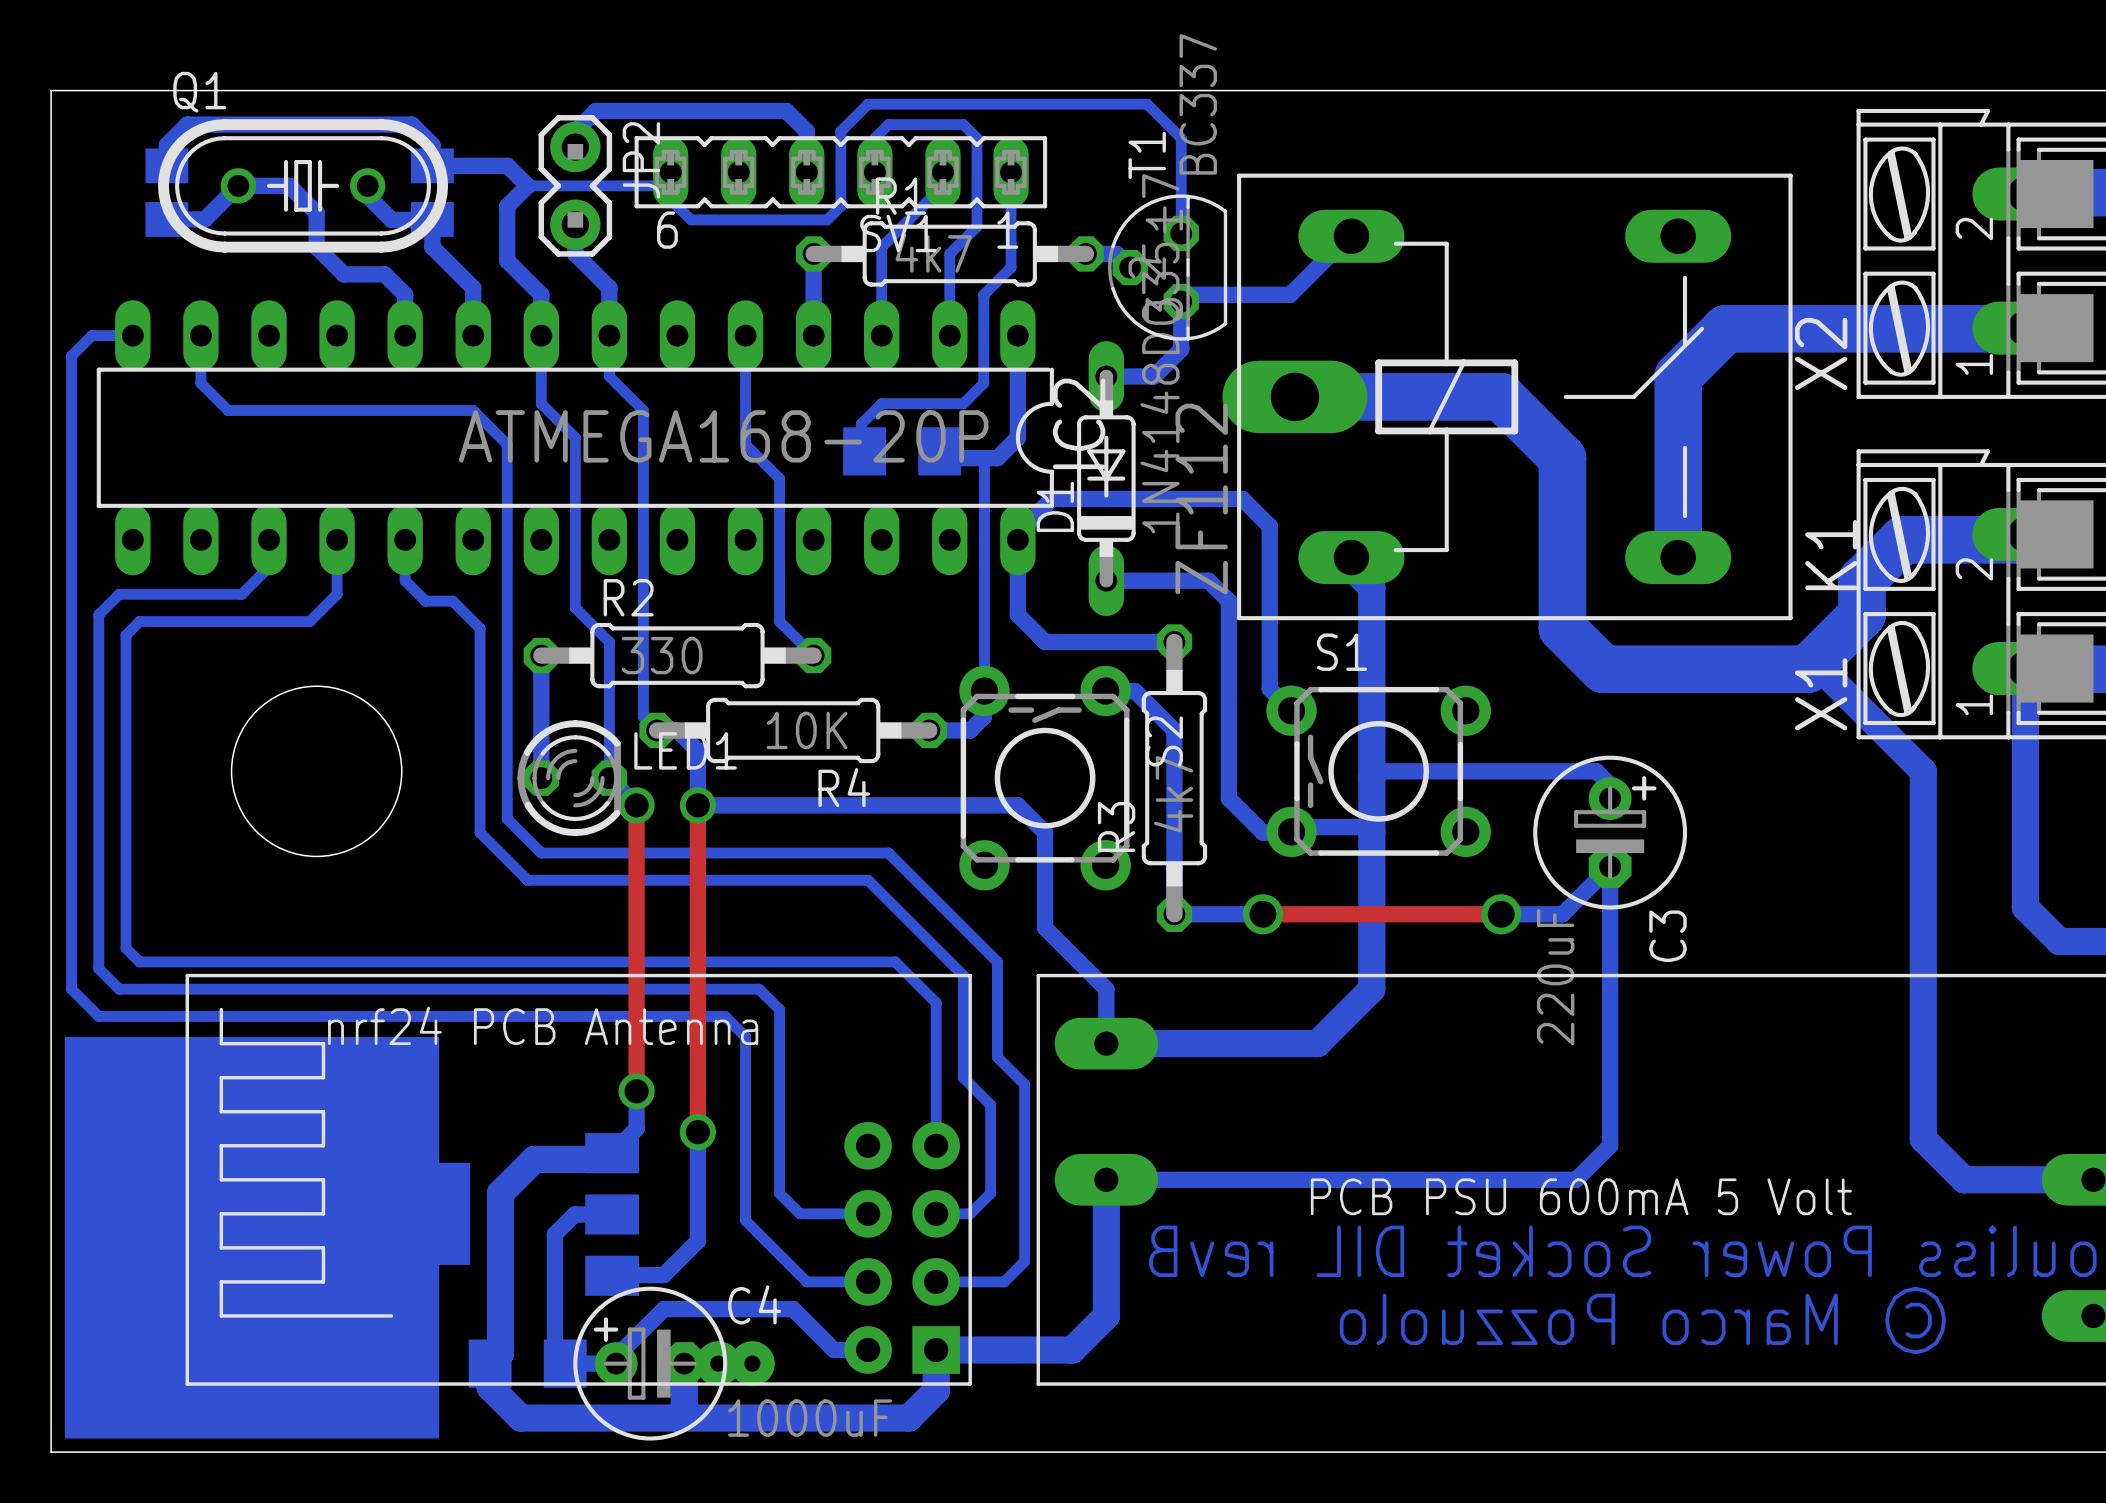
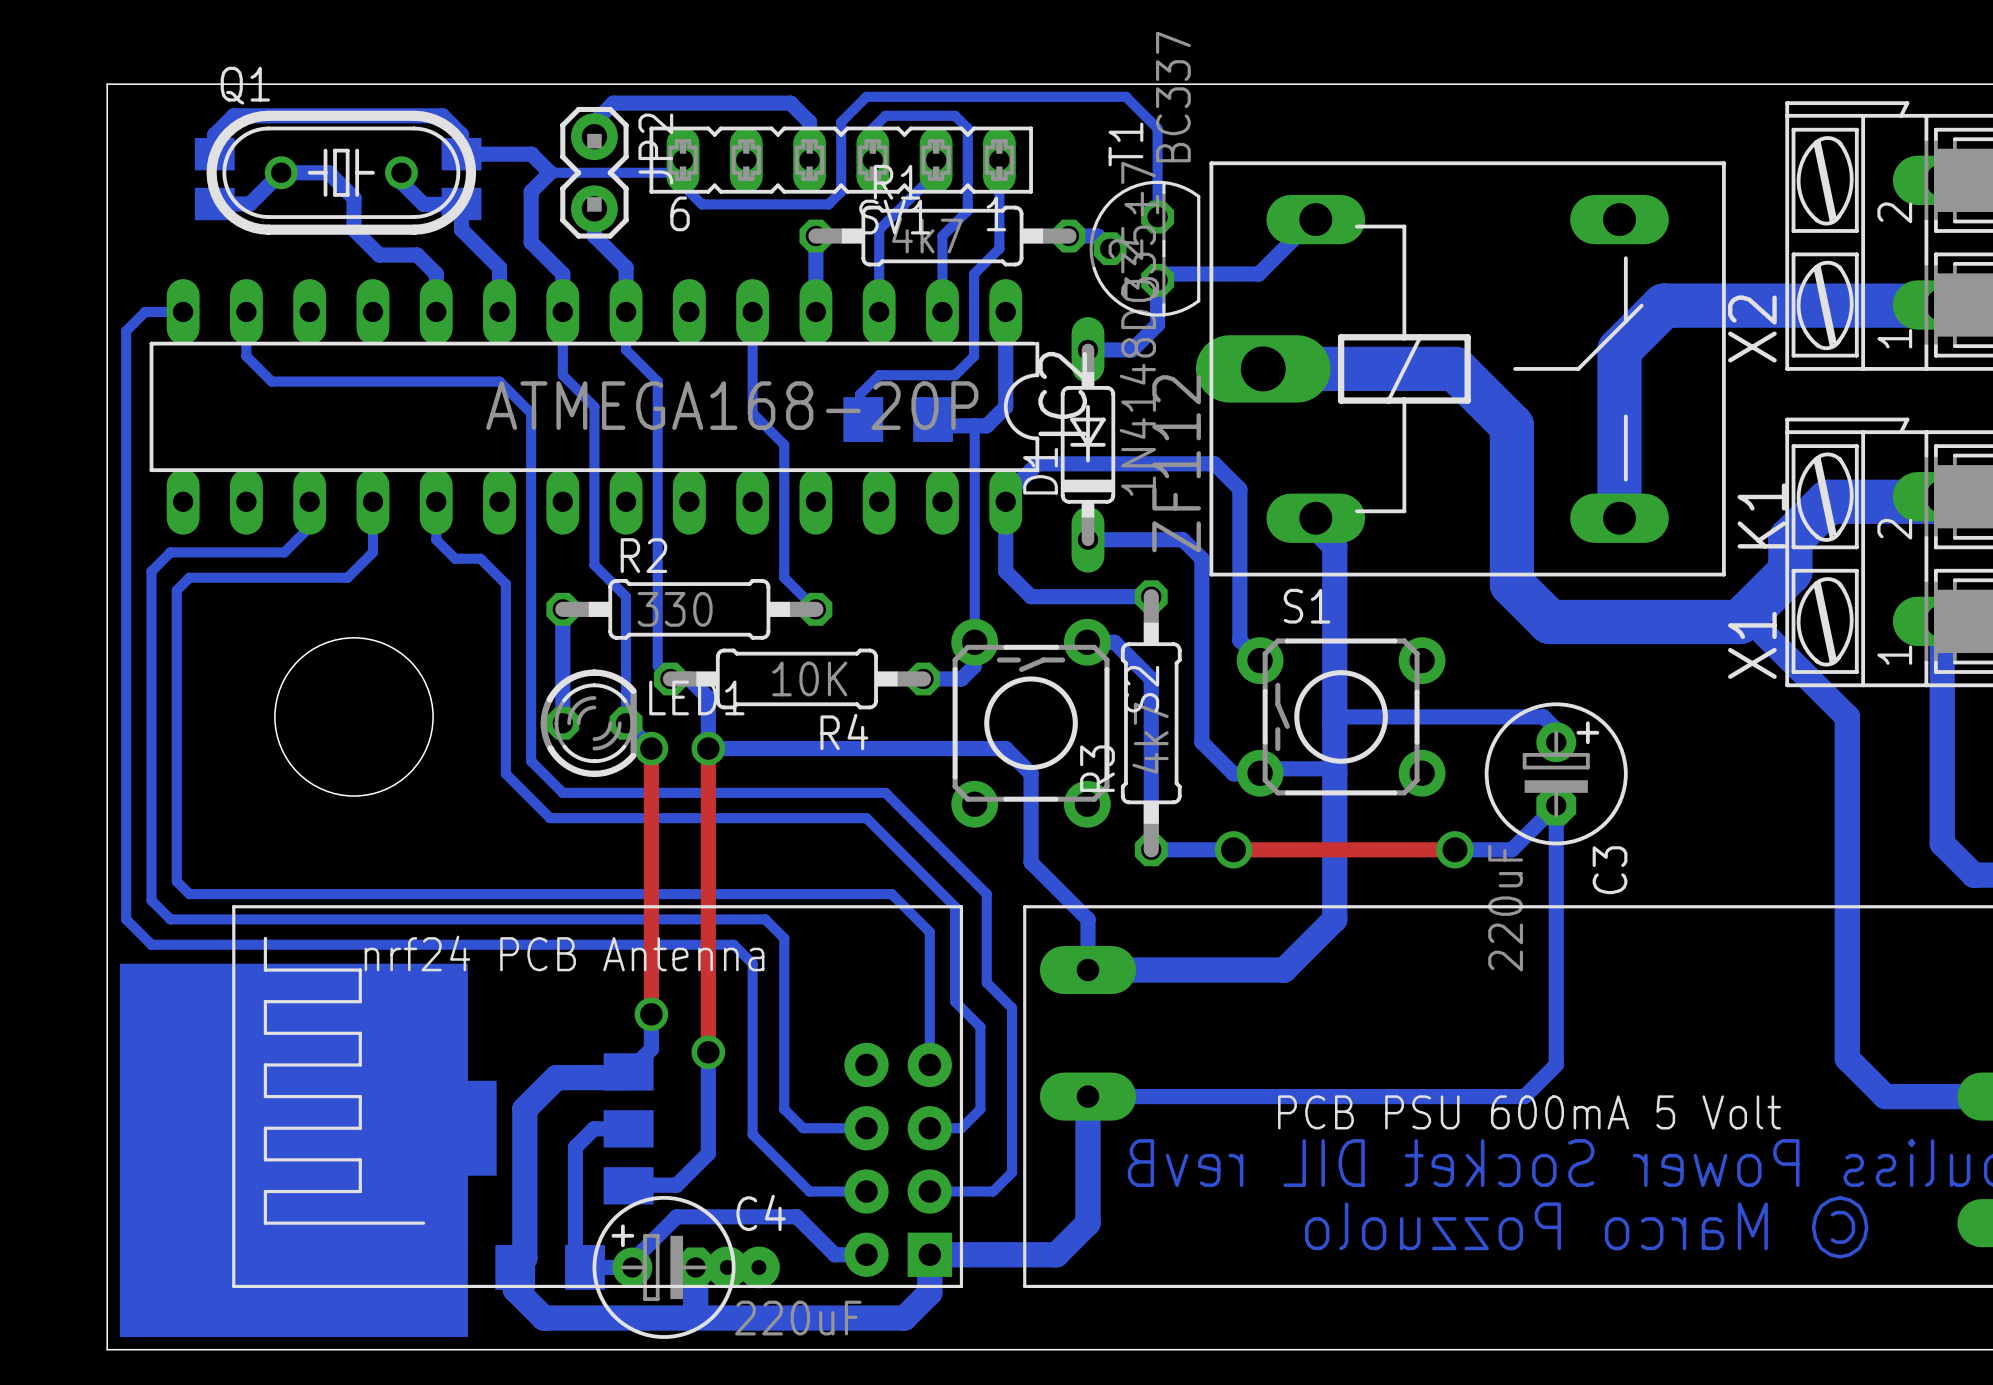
C4 value: 1000uF (810, 1418) -> 220uF (798, 1318)

